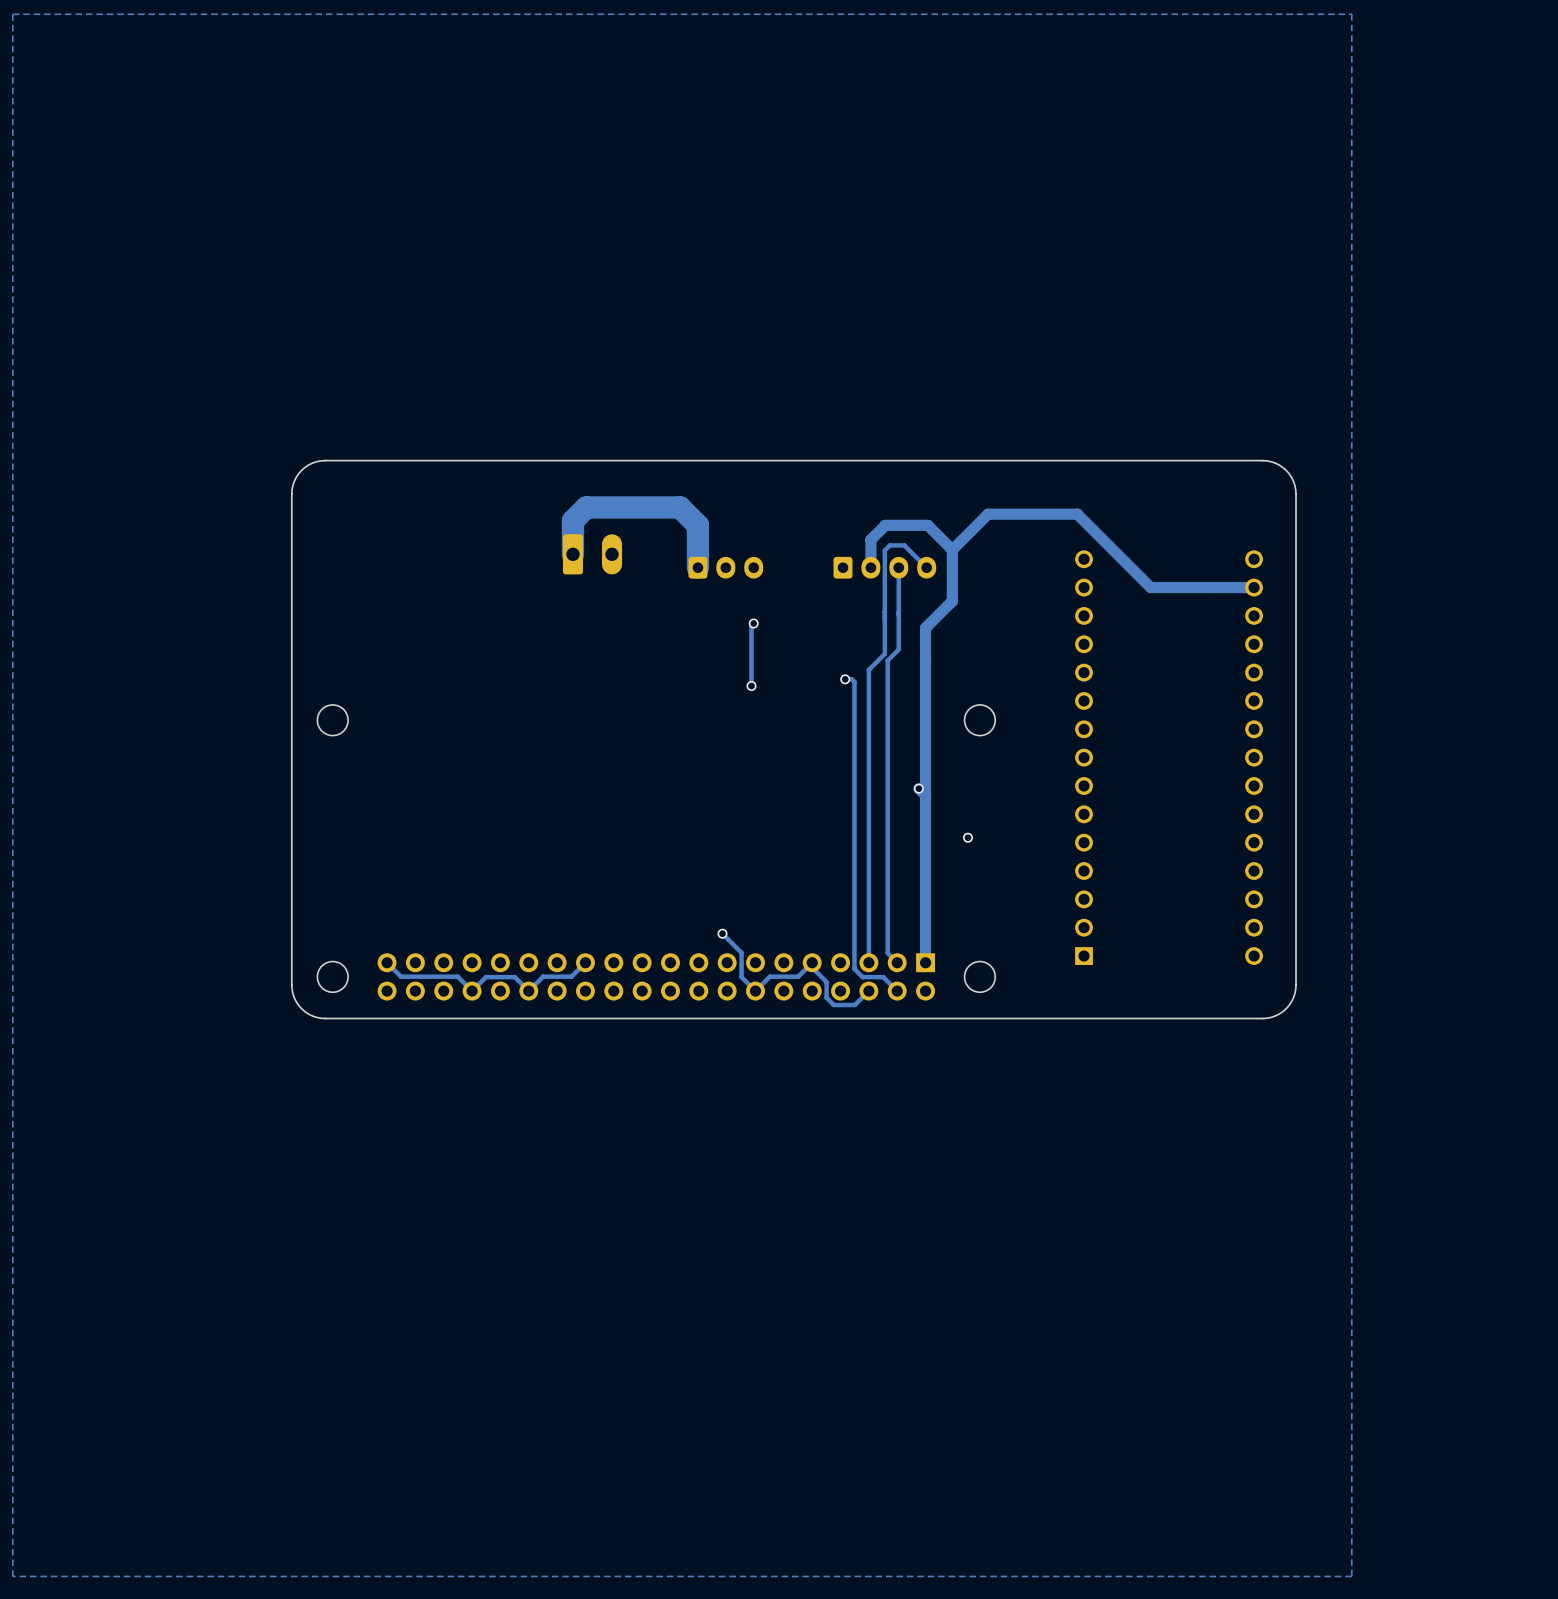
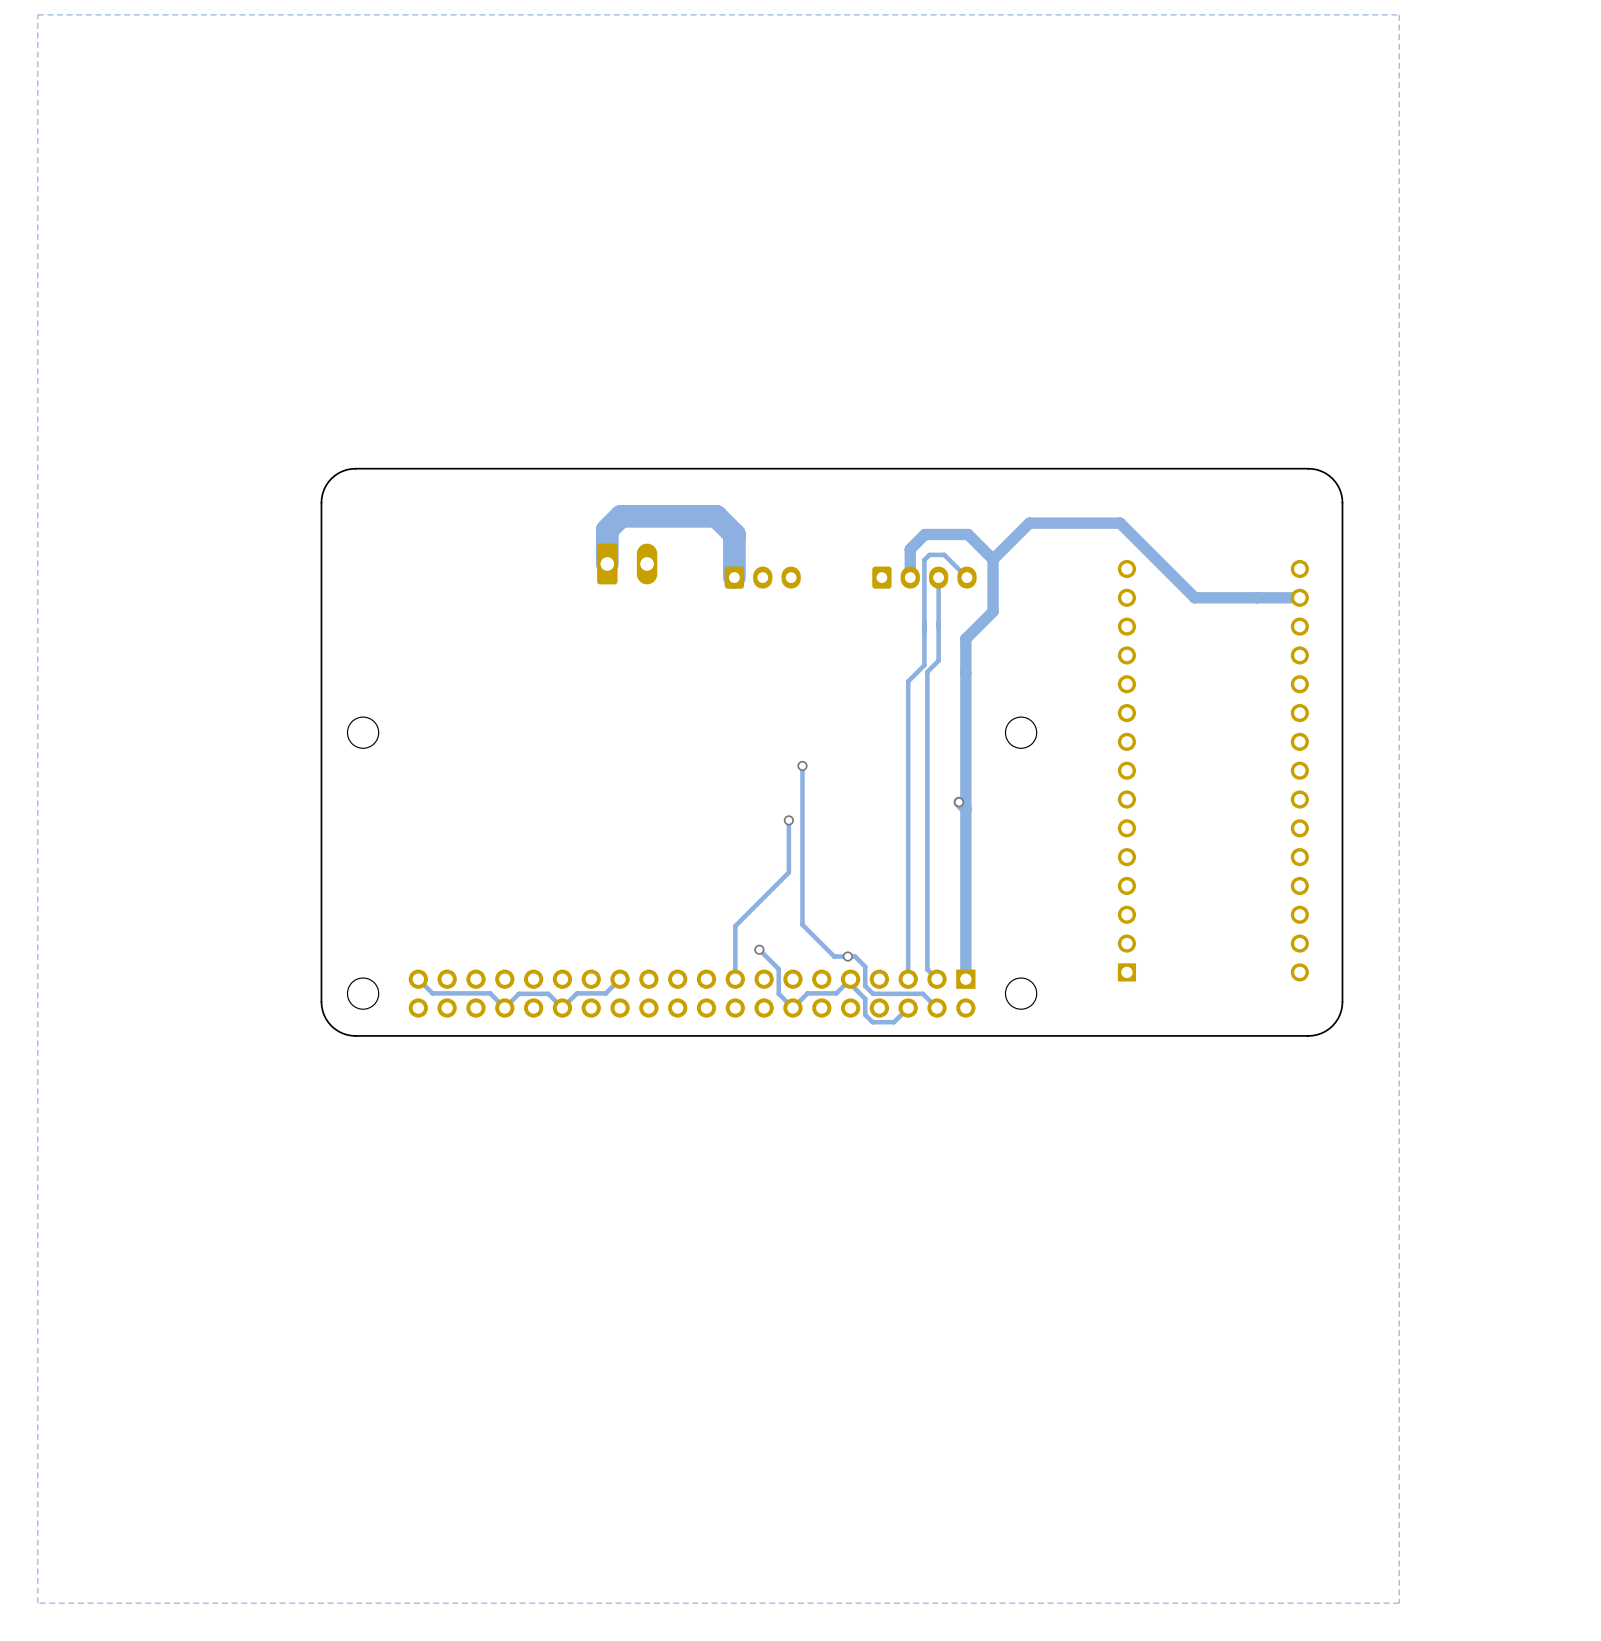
track: (753, 623) (751, 625) (751, 686) -> none
via: (753, 623) -> none
track: (845, 679) (851, 679) (854, 681) (854, 968) (862, 977) -> (803, 767) (802, 765) (802, 924) (834, 956) (855, 956) (865, 966) (865, 986) (873, 993) (901, 993)
via: (845, 679) -> none
via: (751, 686) -> none
via: none -> (802, 765)
via: none -> (788, 820)
track: none -> (789, 821) (788, 872) (735, 926) (735, 979)
via: (967, 837) -> none
via: none -> (847, 956)

